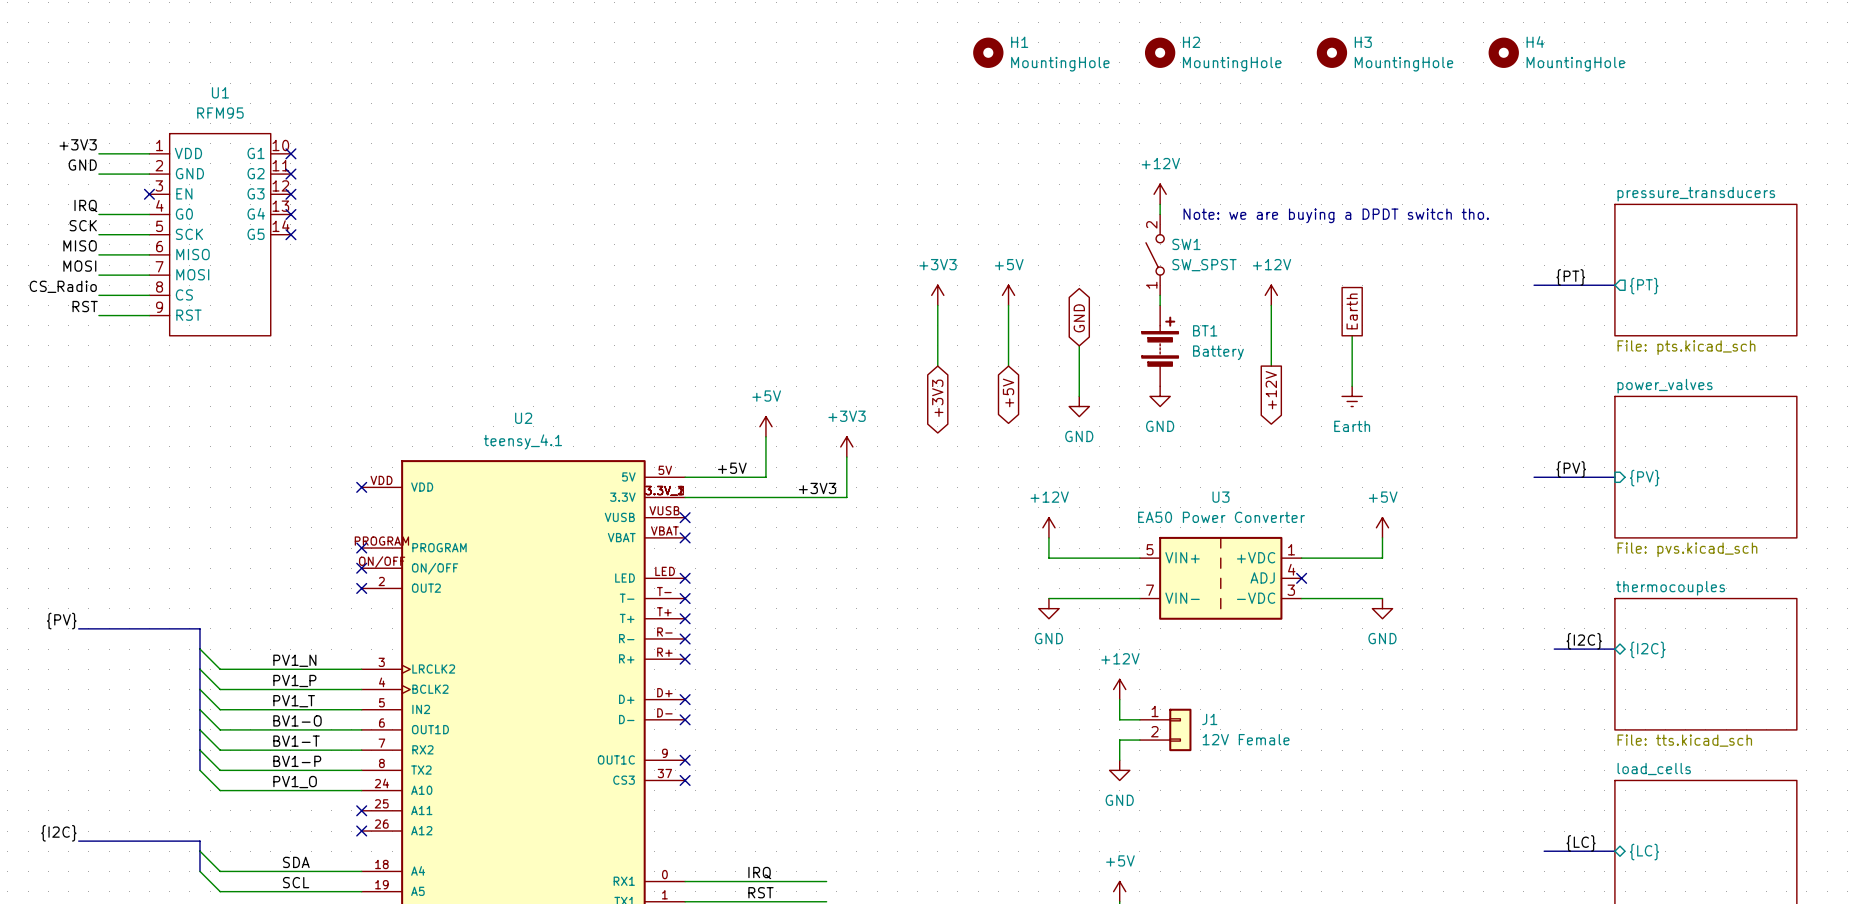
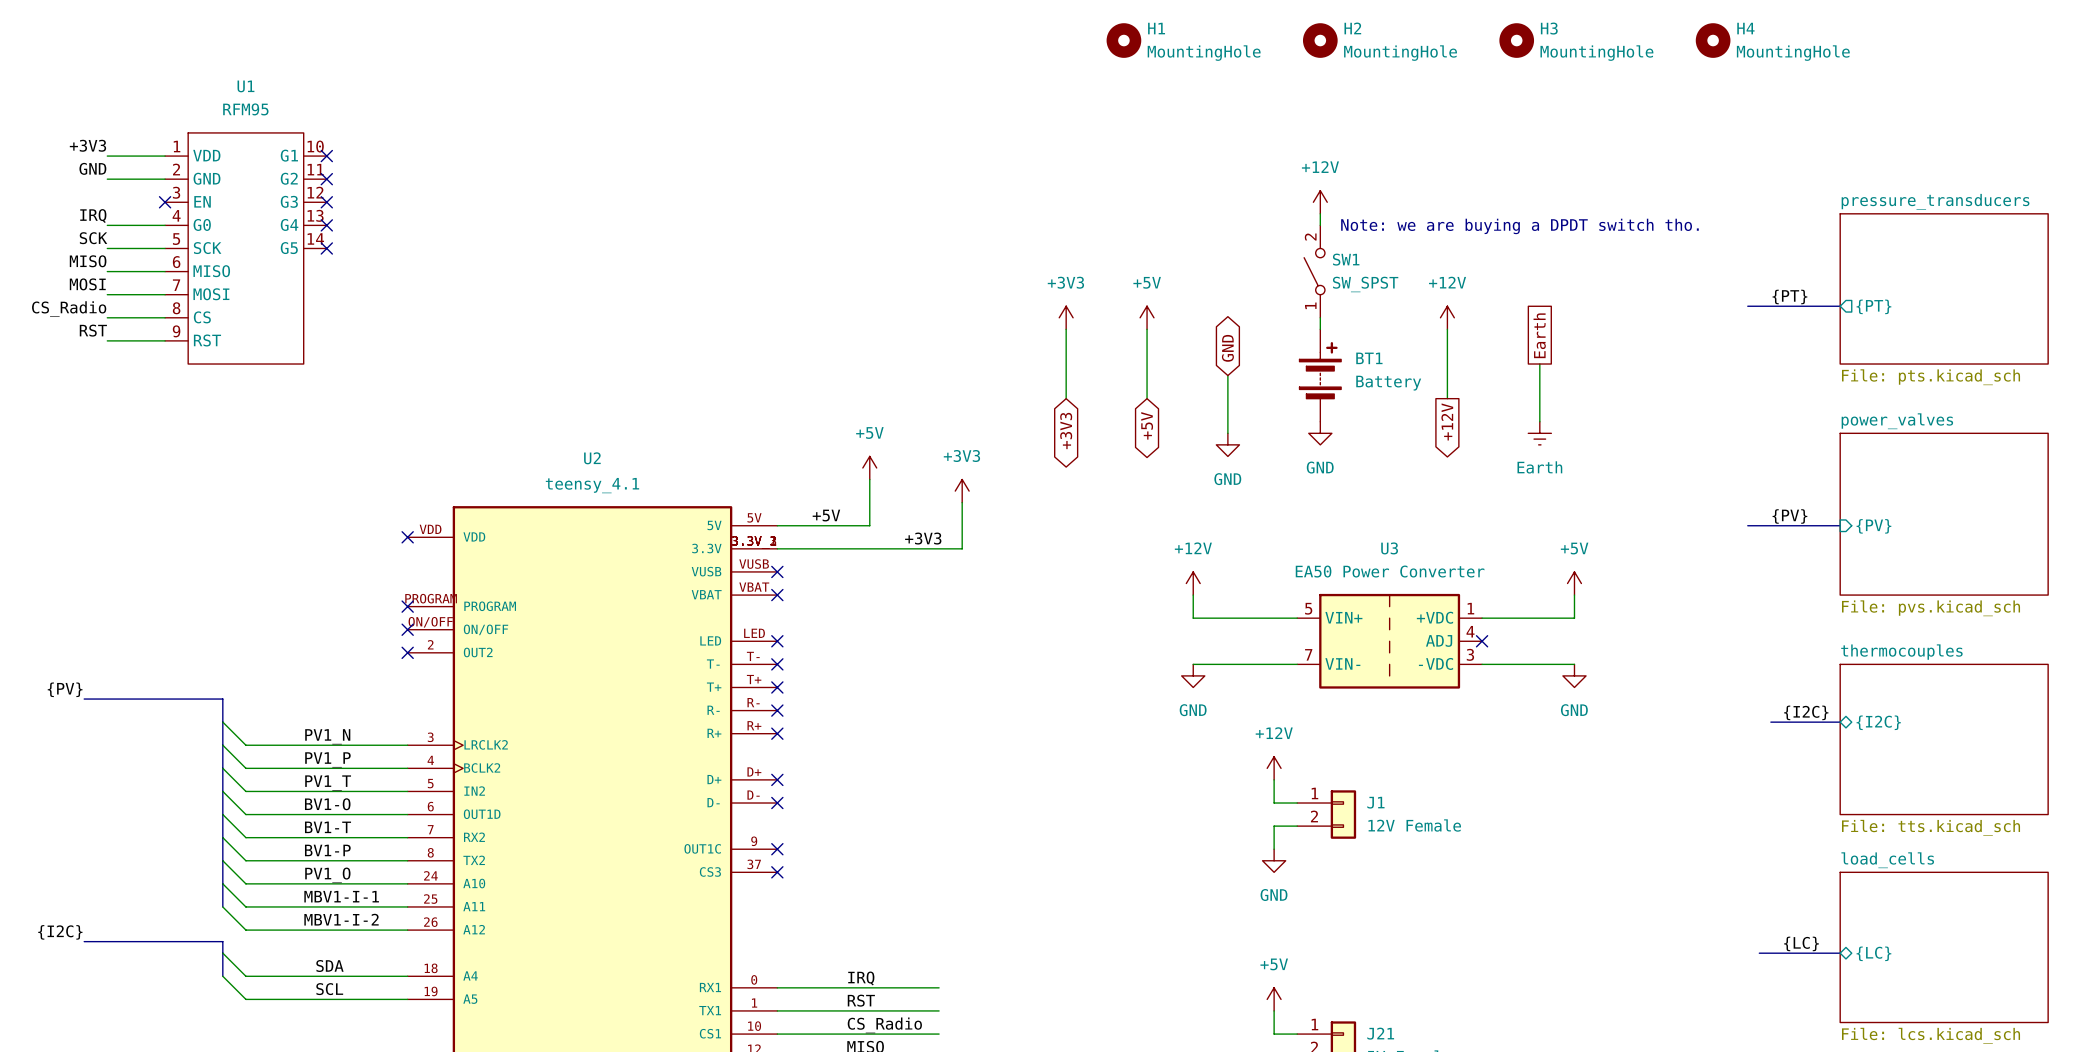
bus: none -> (222, 860) (222, 906)
wire: none -> (222, 883) (245, 906) (407, 906)
label: none -> MBV1-I-1 (341, 896)
wire: none -> (222, 906) (245, 930) (407, 930)
no-connect mark: (361, 810) -> none
label: none -> MBV1-I-2 (341, 919)
no-connect mark: (361, 831) -> none

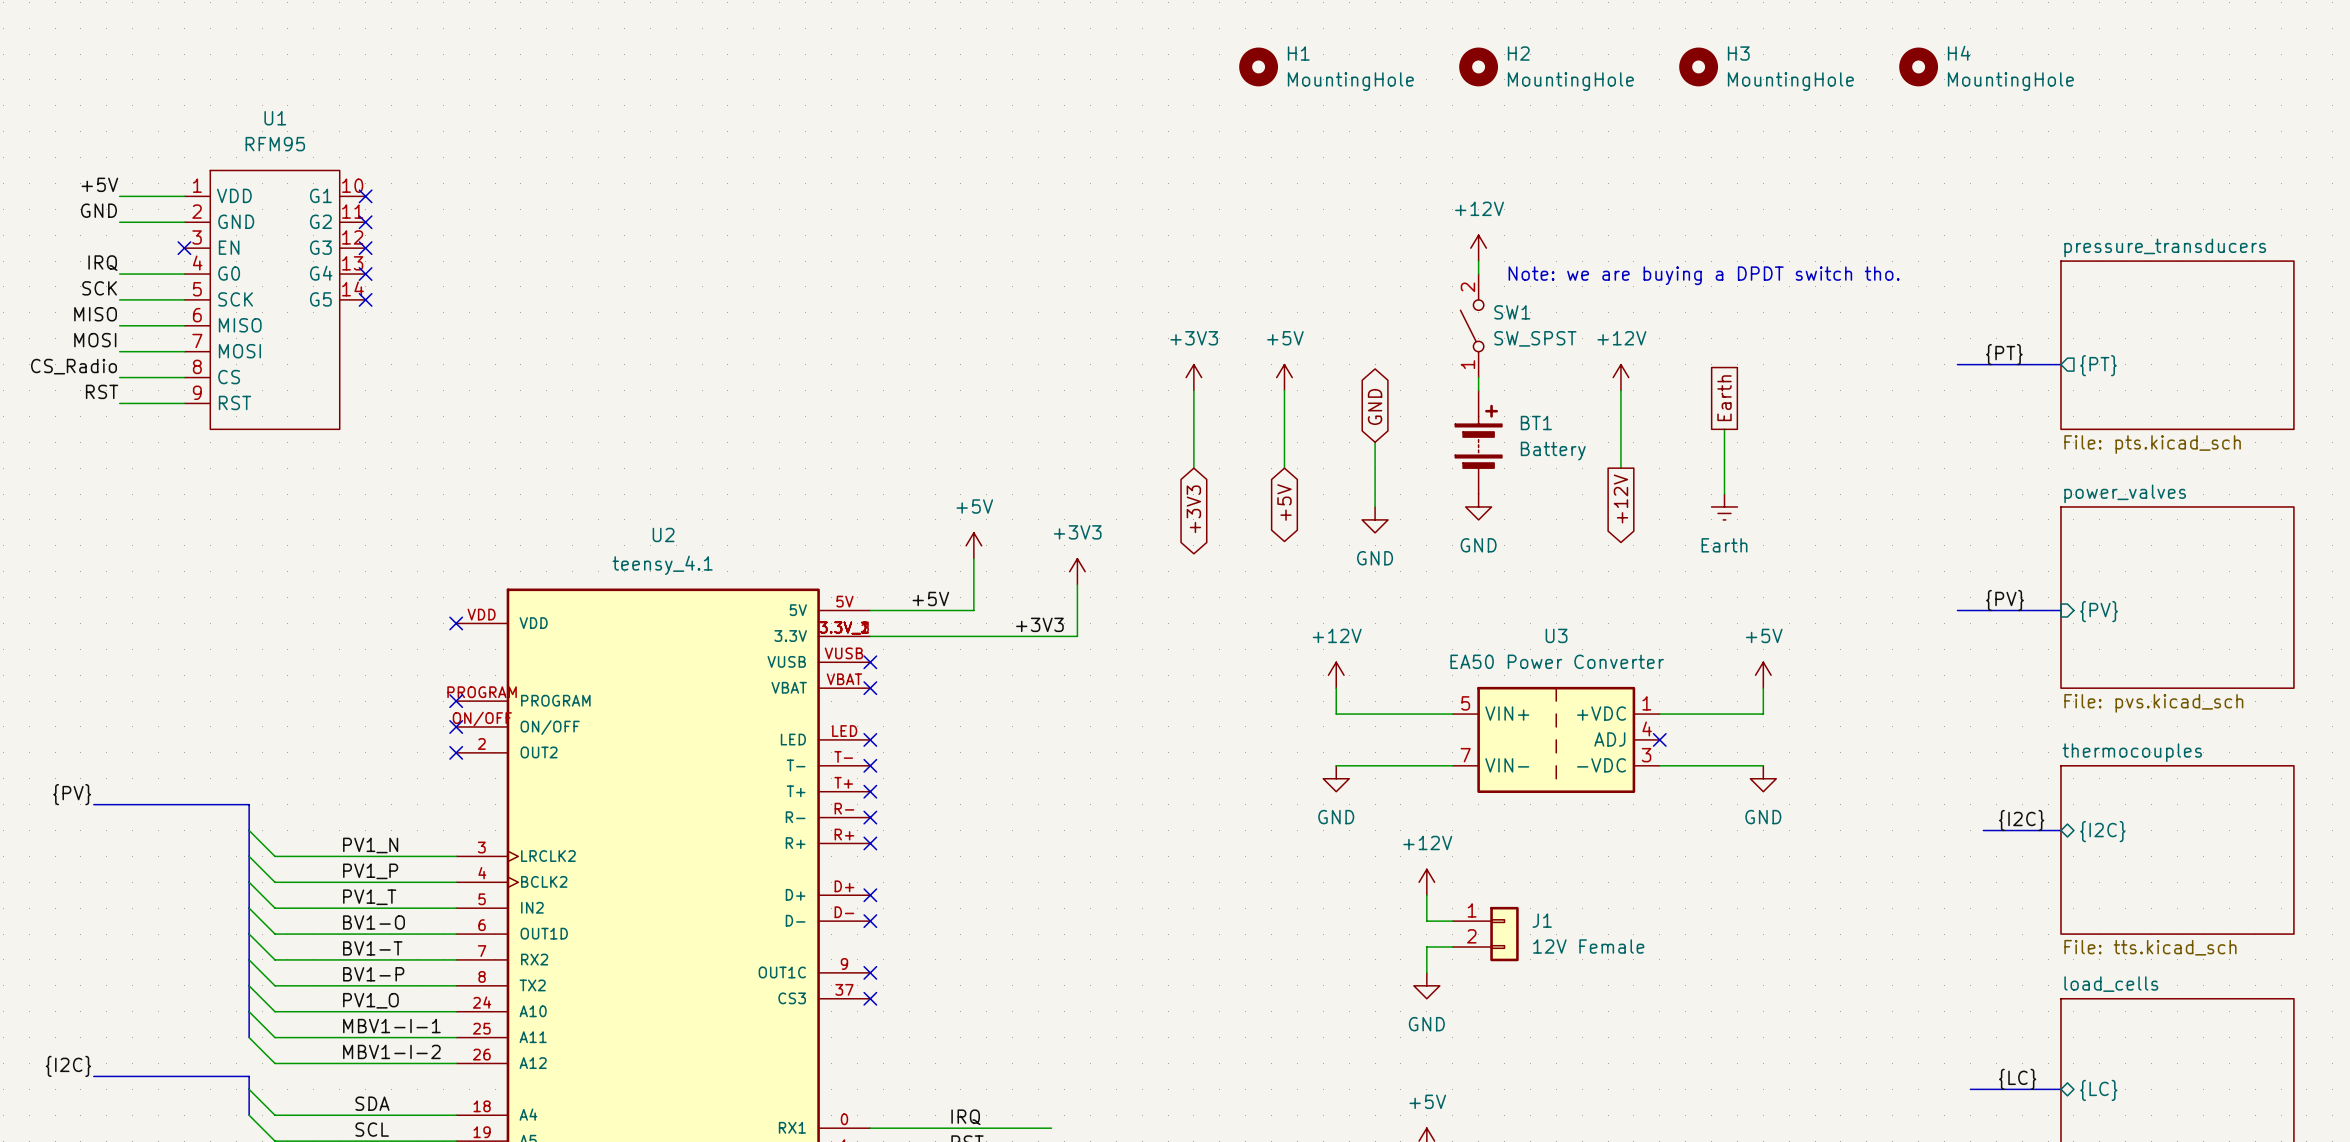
label: +3V3 (87, 145) -> +5V (99, 184)

